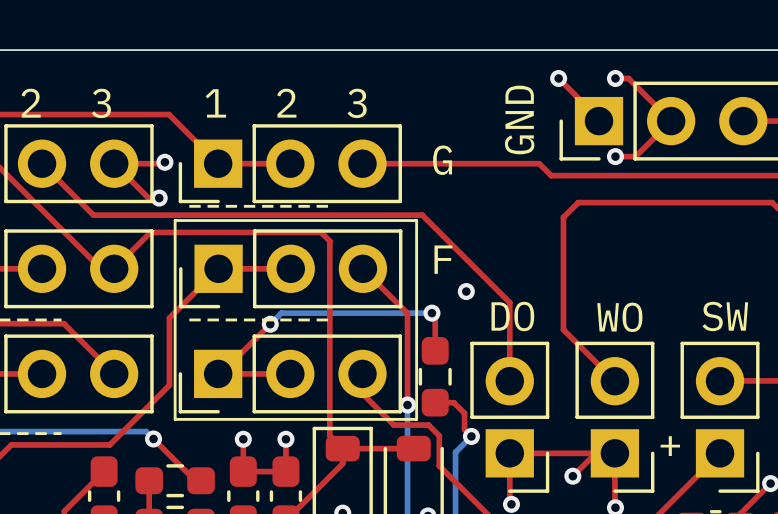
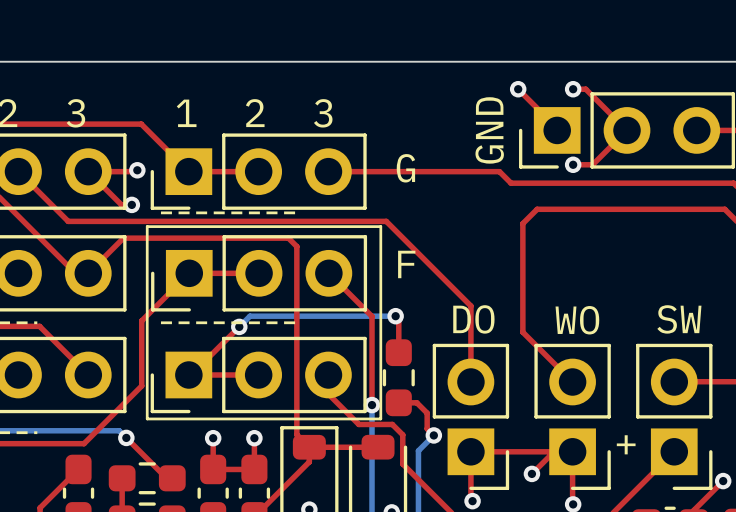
text: GND (519, 119) -> none
GND name: none -> GND (489, 130)
via: (466, 291) -> none

